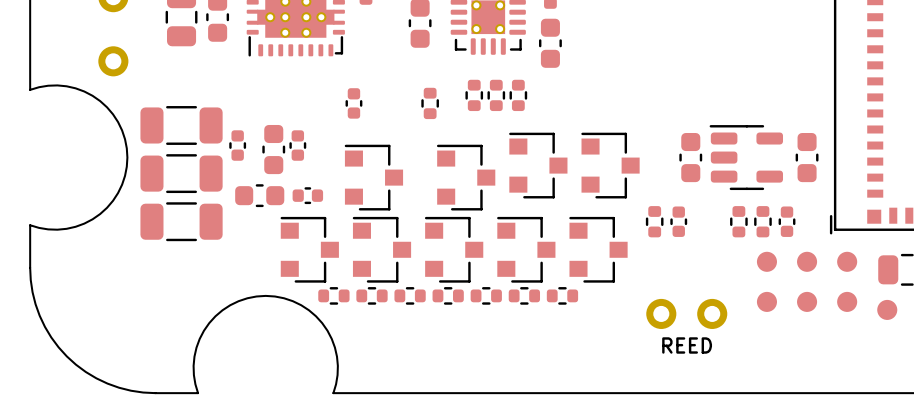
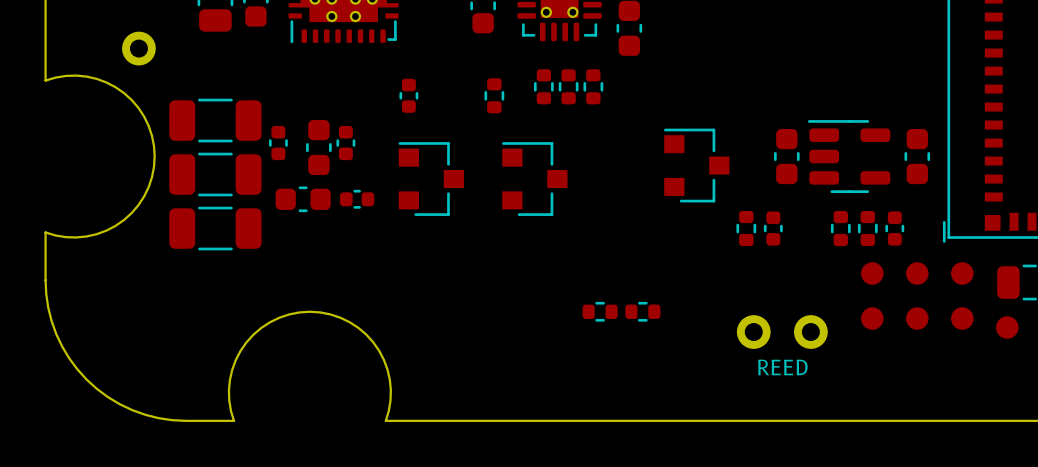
part: (538, 165) -> none
part: (309, 249) -> none
part: (381, 249) -> none
part: (454, 249) -> none
part: (526, 249) -> none
part: (598, 249) -> none
part: (333, 295) -> none
part: (372, 295) -> none
part: (410, 295) -> none
part: (448, 295) -> none
part: (486, 295) -> none

